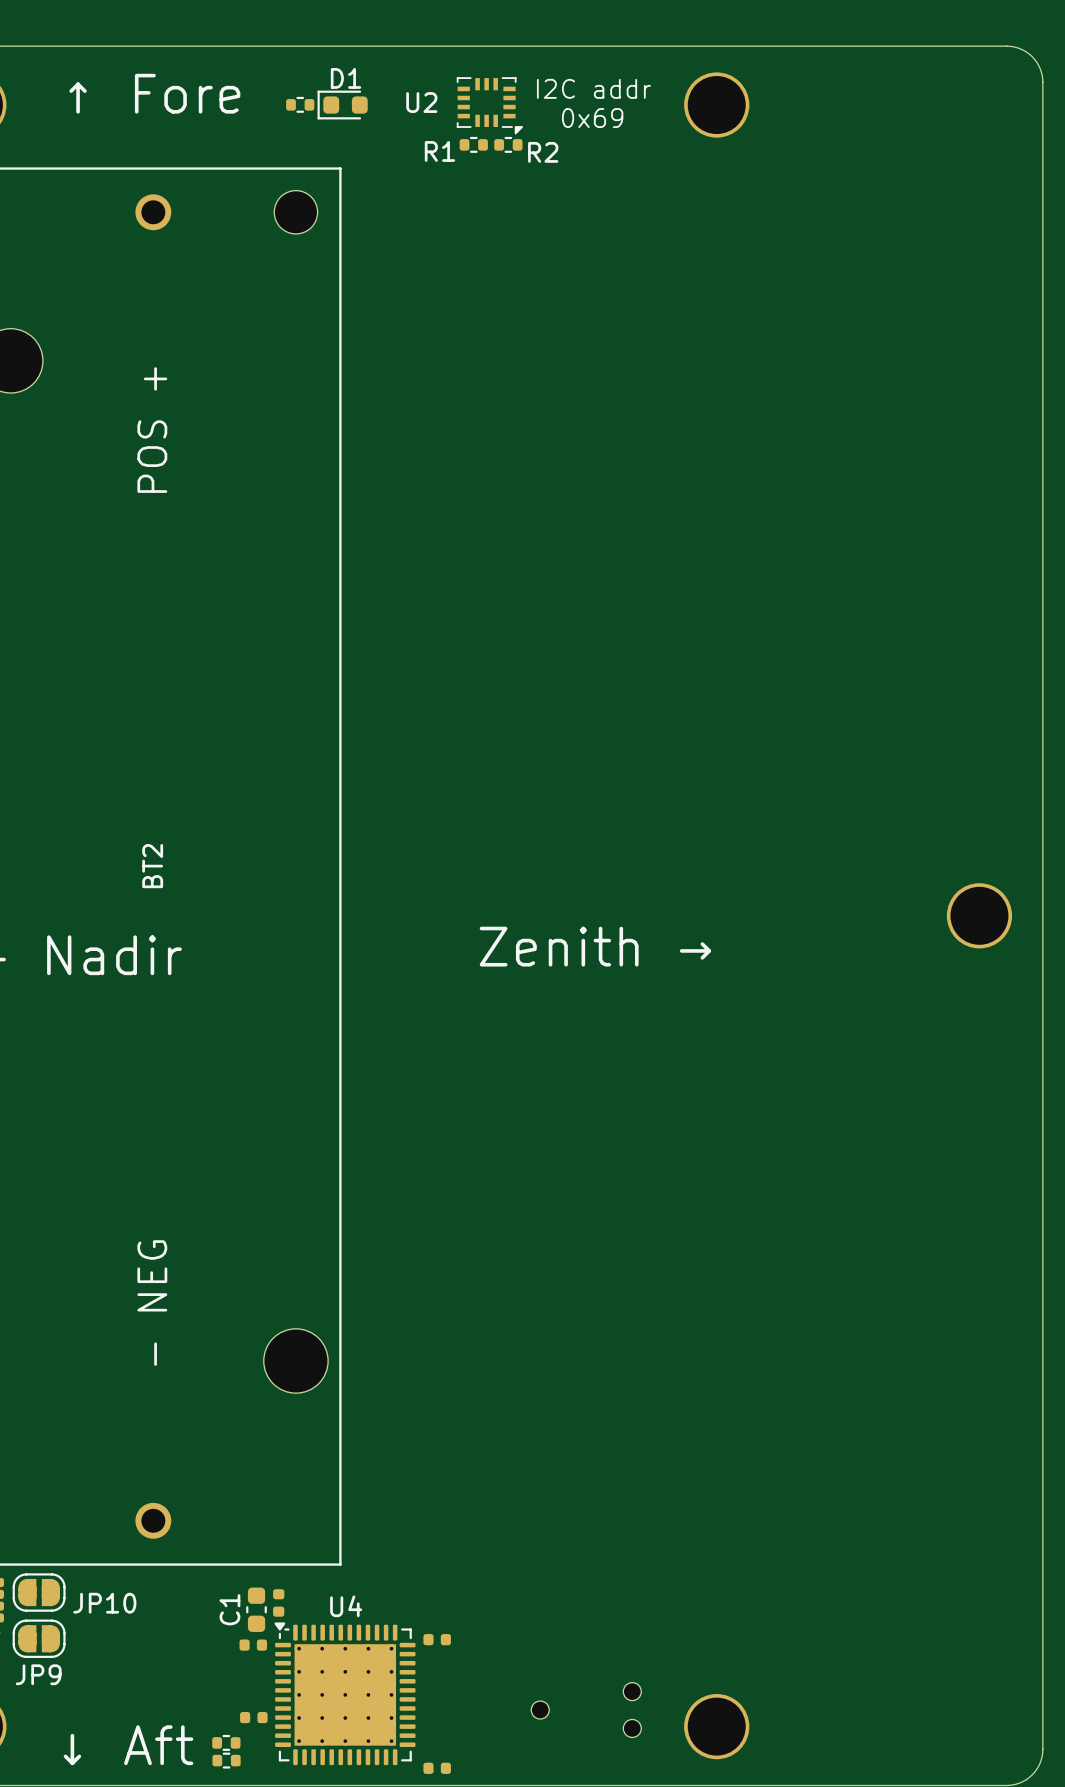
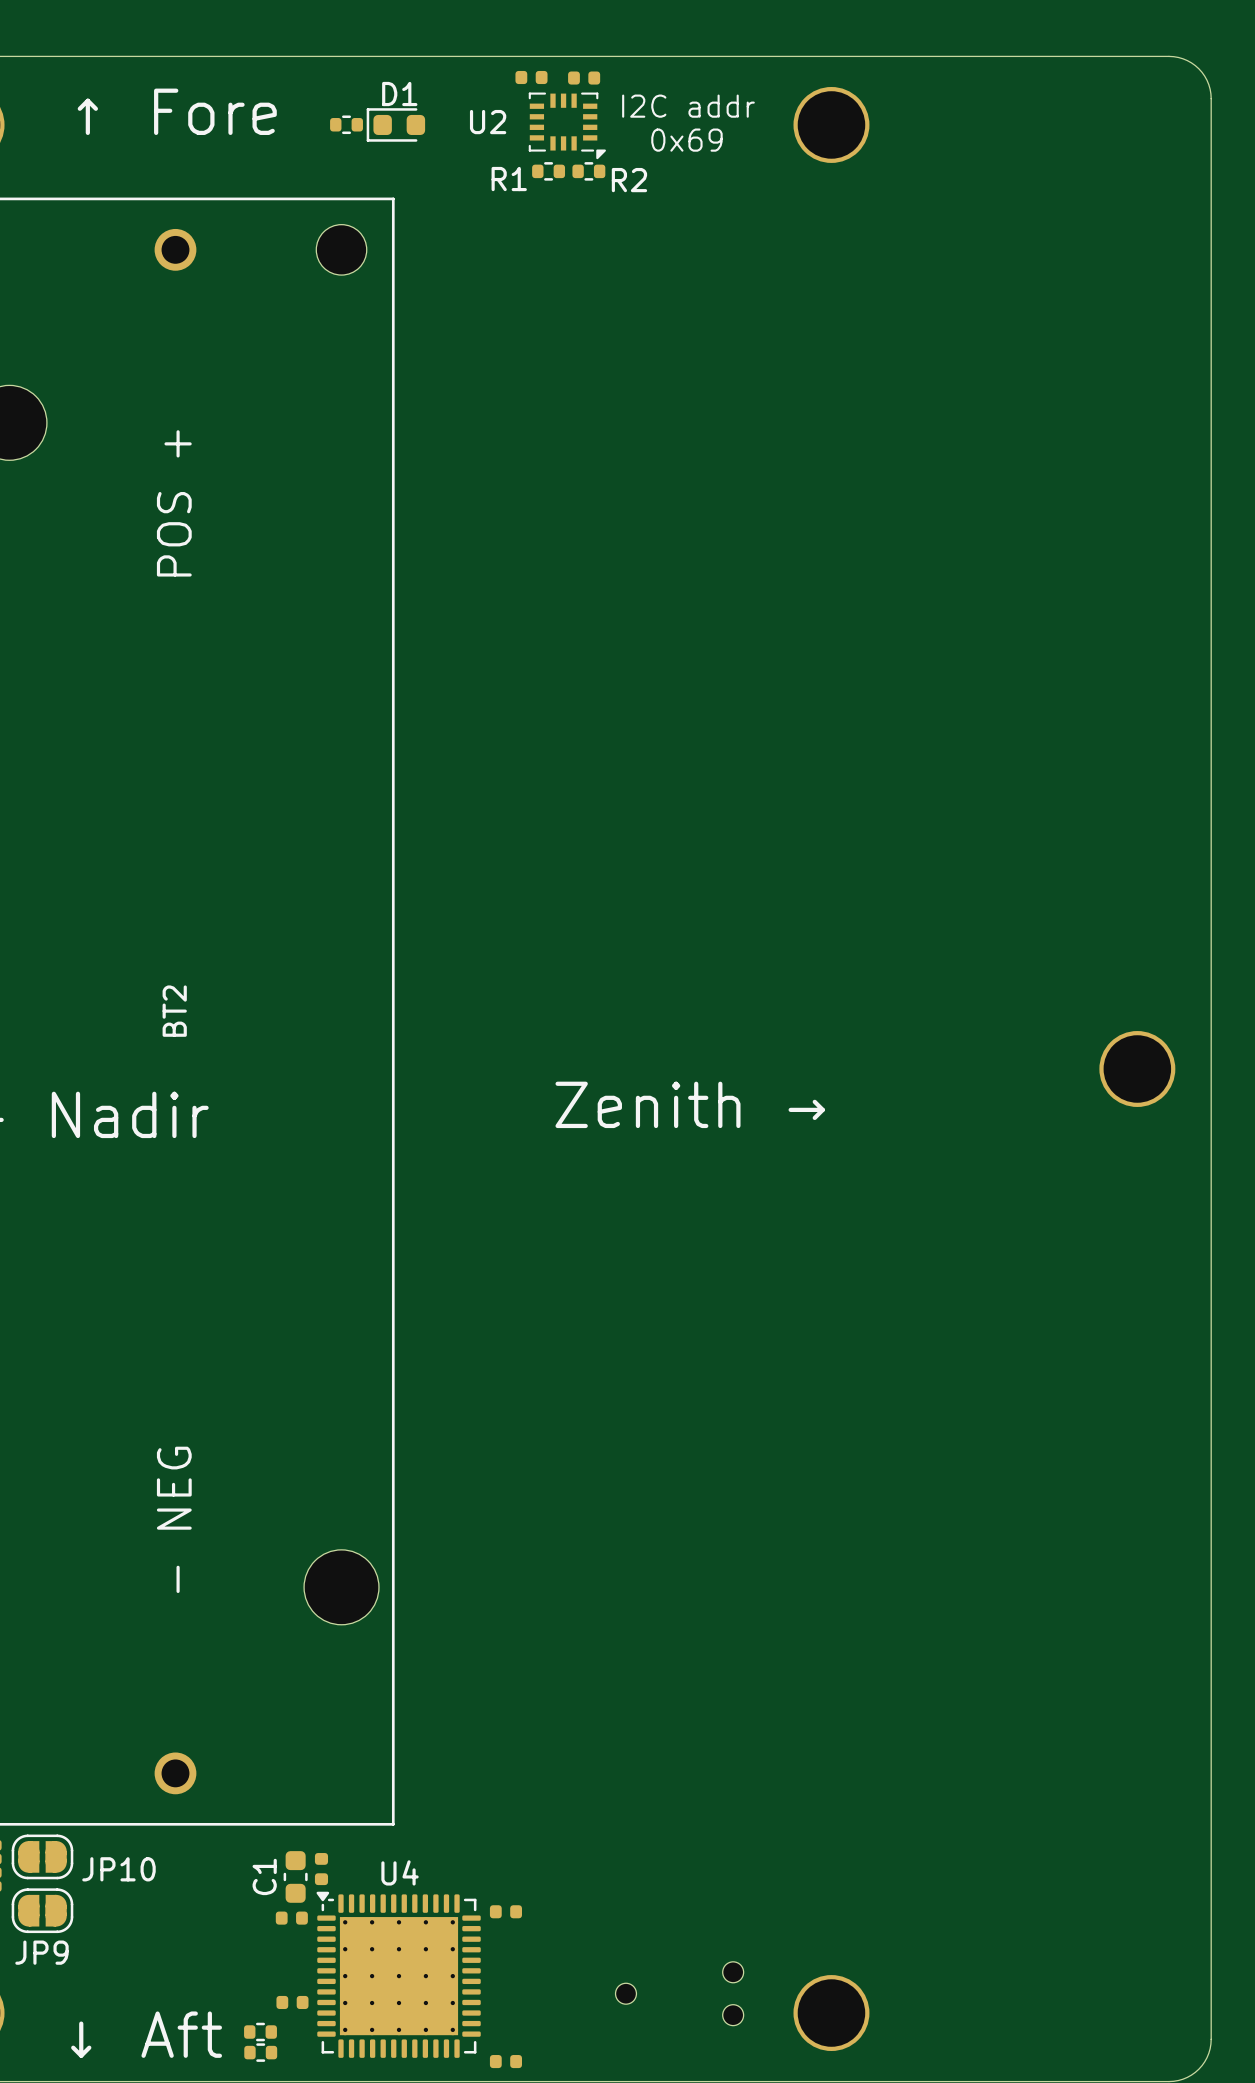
part: none -> (531, 77)
part: none -> (584, 78)

